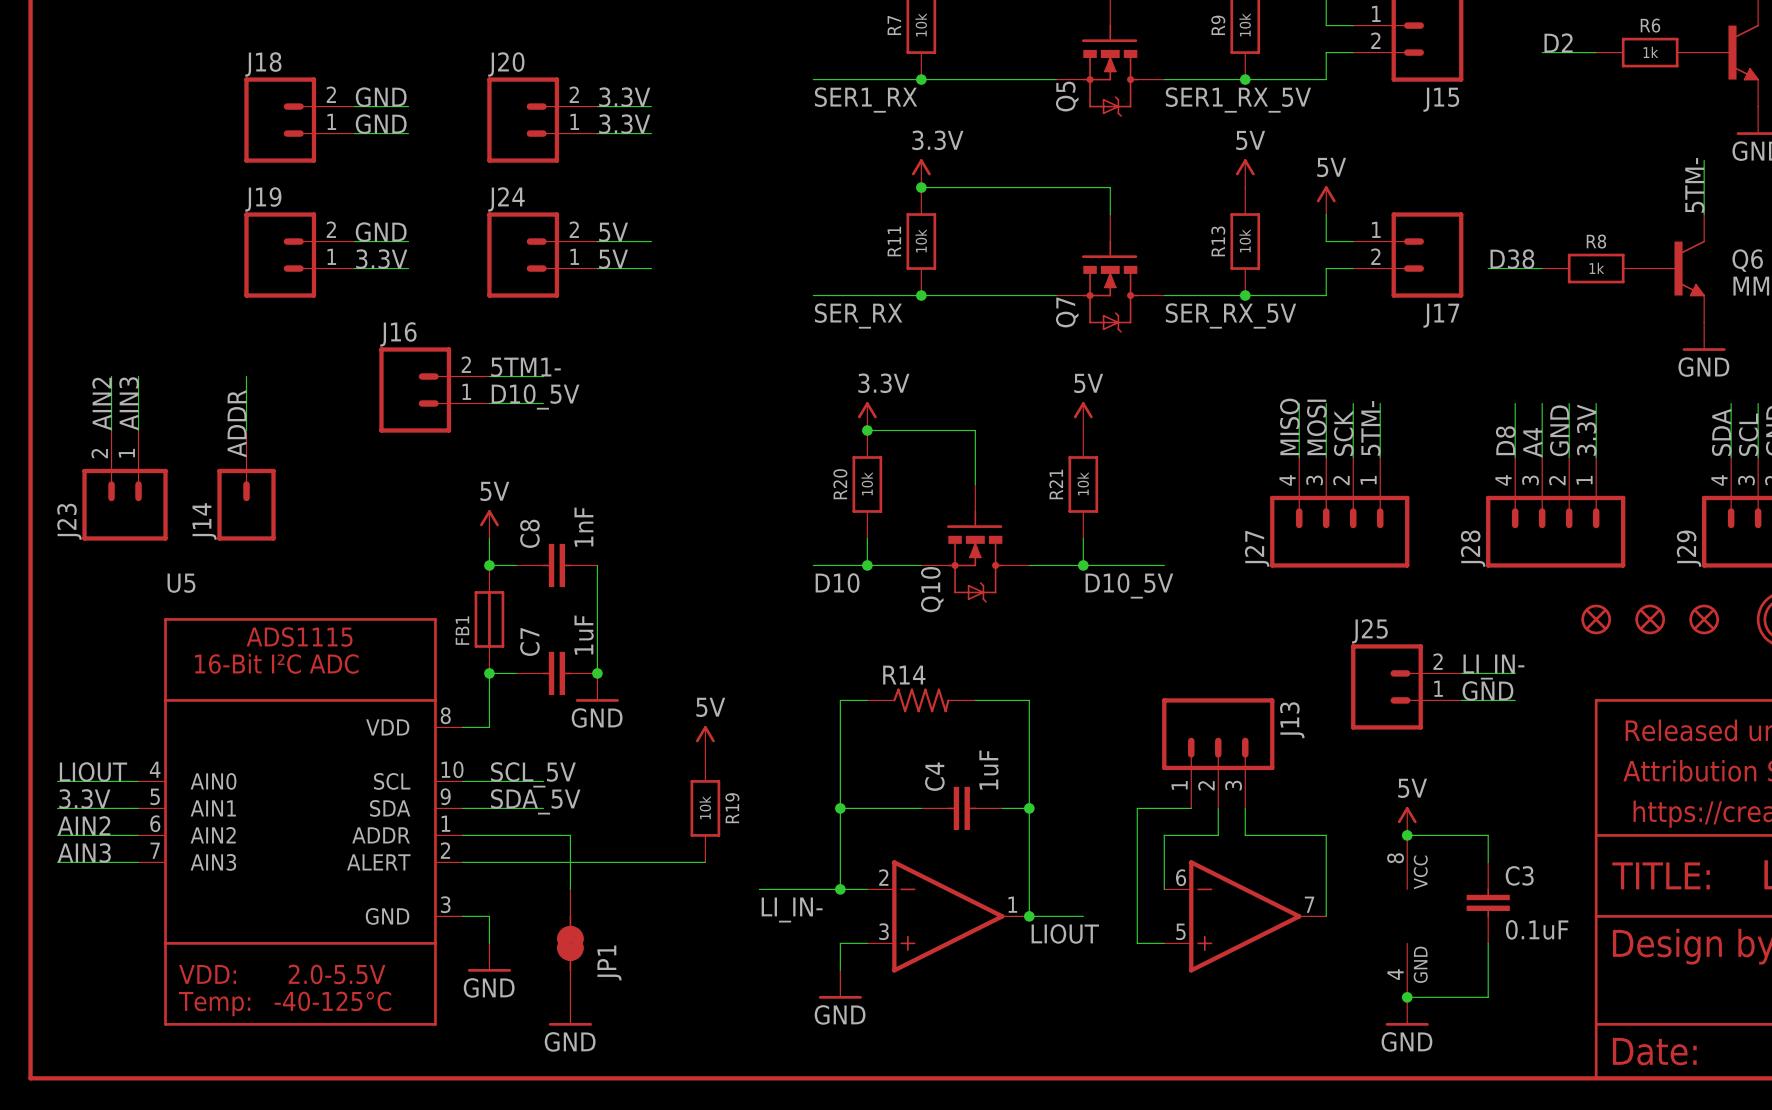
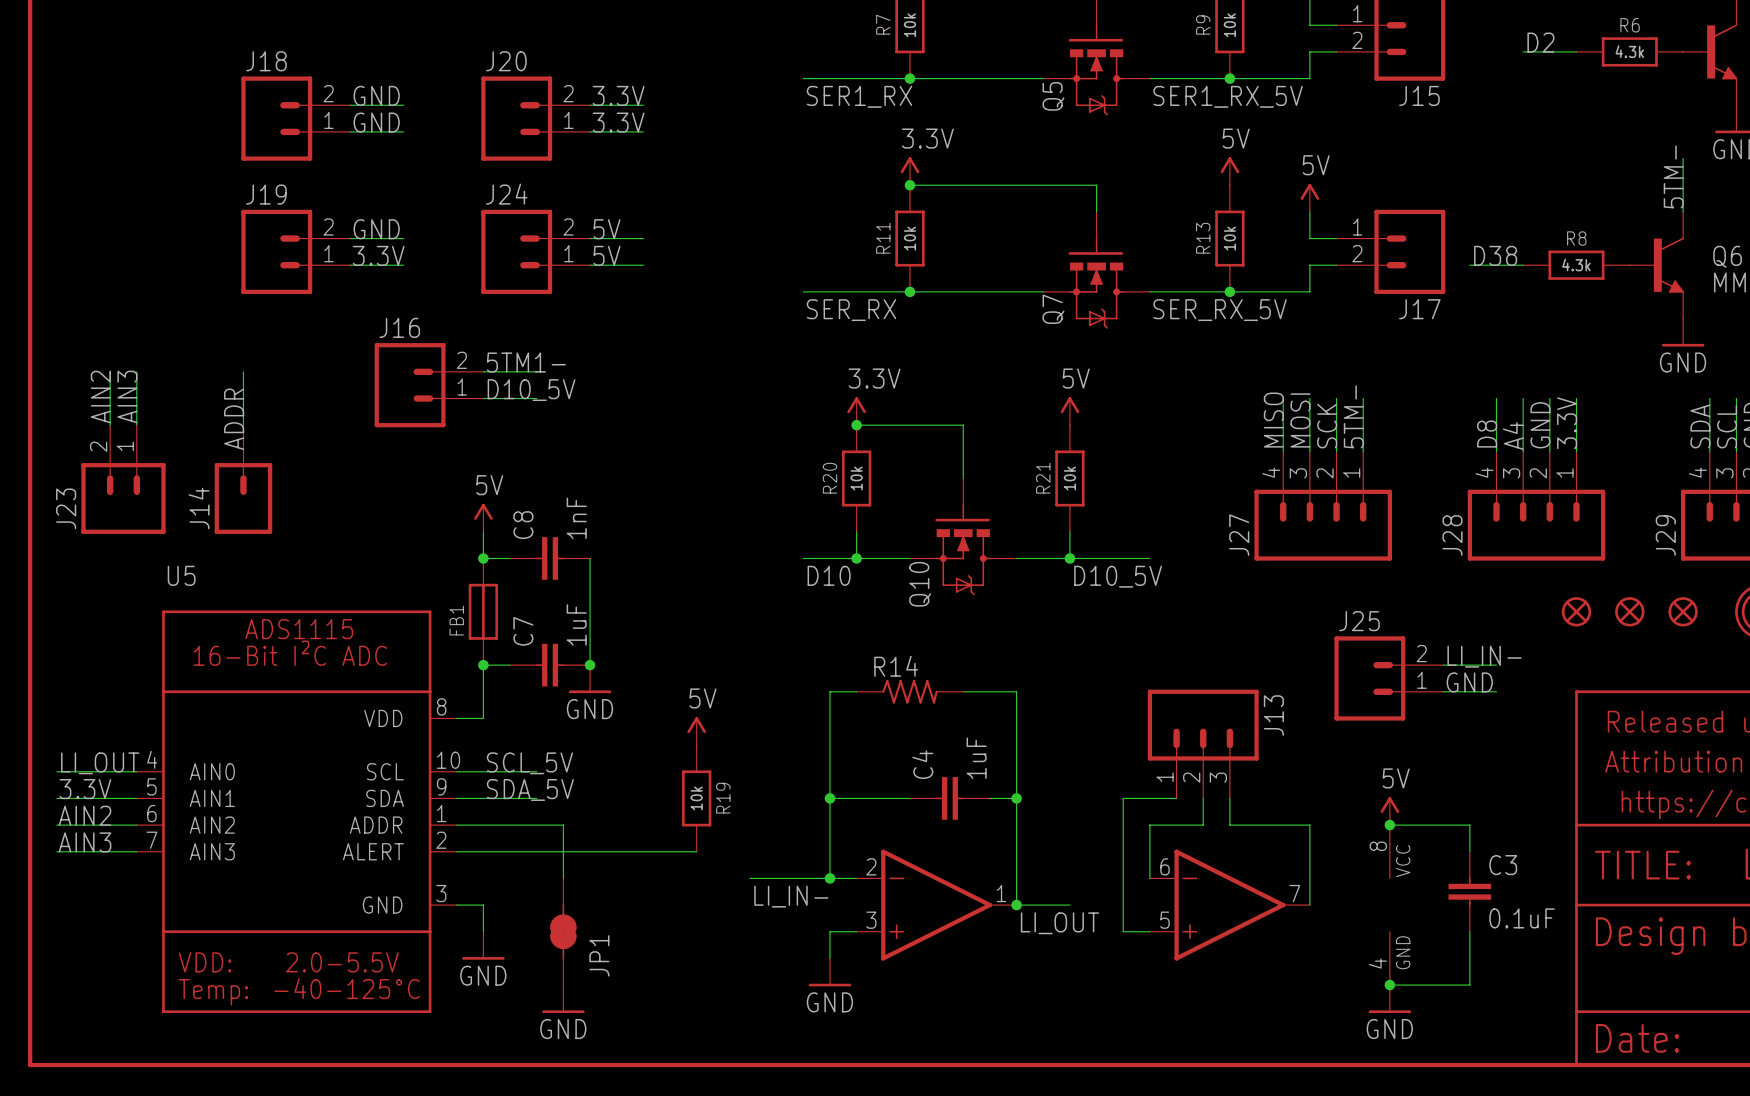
R6 value: 1k (1650, 52) -> 4.3k (1629, 51)
R8 value: 1k (1596, 268) -> 4.3k (1576, 264)
label: LIOUT (93, 771) -> LI_OUT (100, 763)
label: LIOUT (1065, 933) -> LI_OUT (1059, 923)

